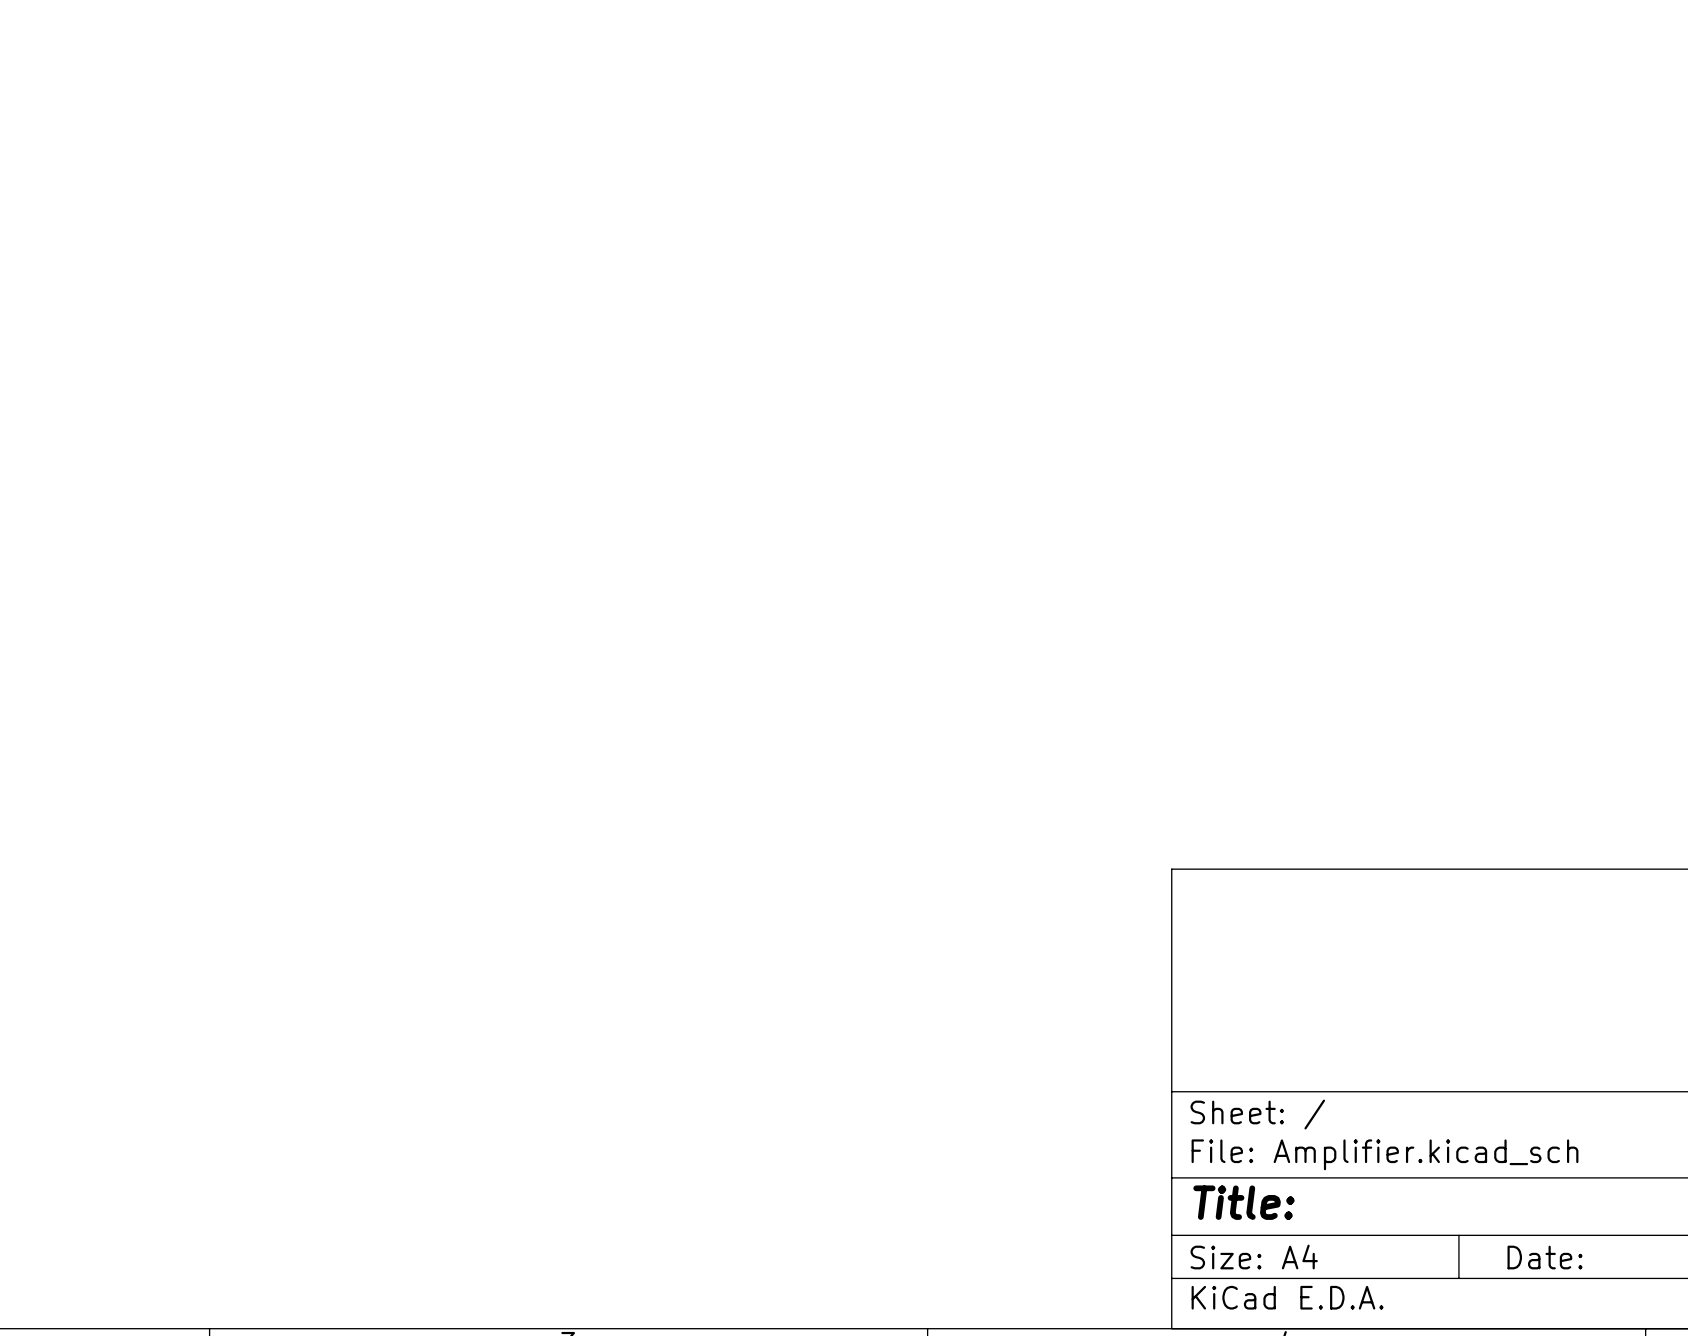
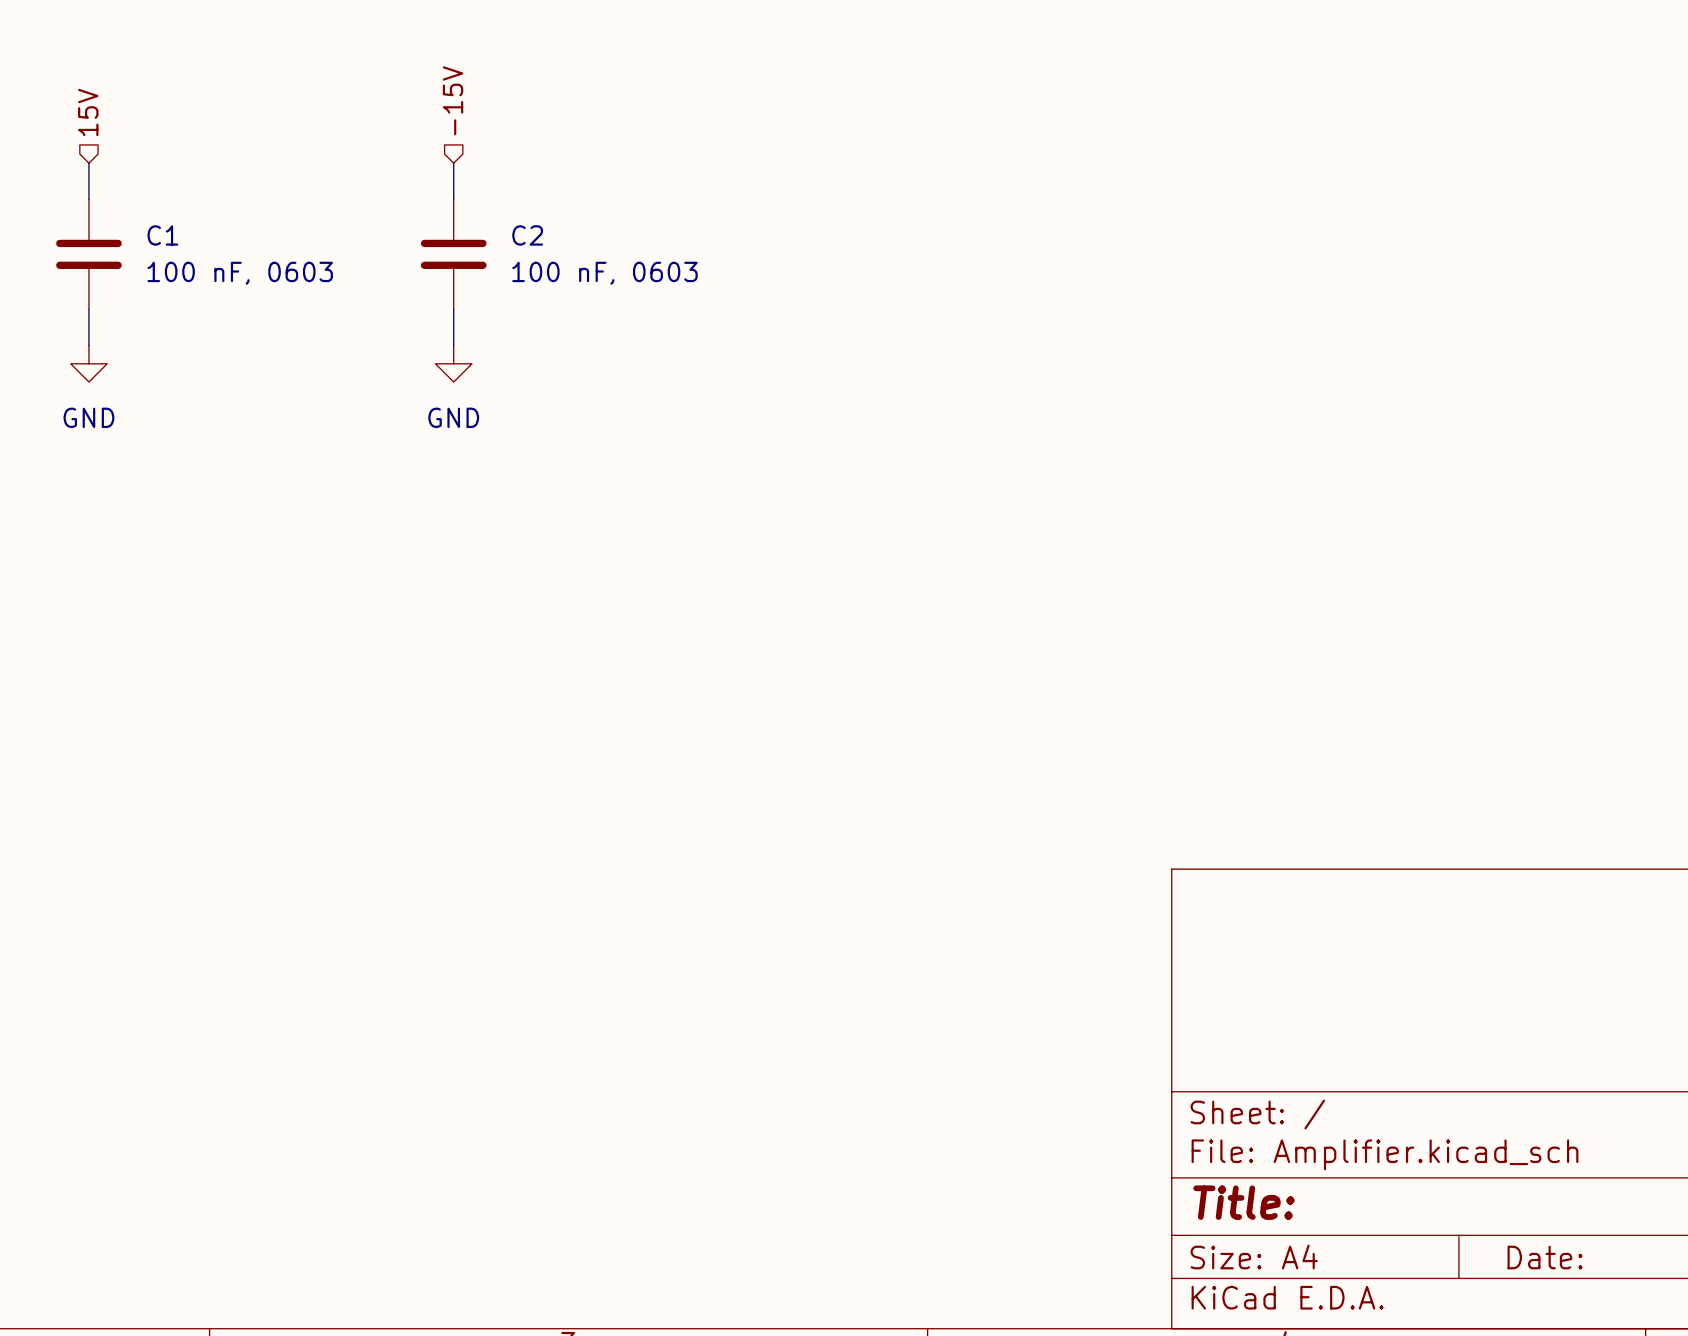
hierarchical label: none -> -15V (453, 100)
hierarchical label: none -> 15V (88, 112)
wire: none -> (88, 163) (88, 199)
wire: none -> (453, 163) (453, 199)
C1: none -> 100 nF, 0603 (88, 254)
C2: none -> 100 nF, 0603 (453, 254)
wire: none -> (88, 309) (88, 345)
wire: none -> (453, 309) (453, 345)
power symbol: none -> GND (88, 363)
power symbol: none -> GND (453, 363)

